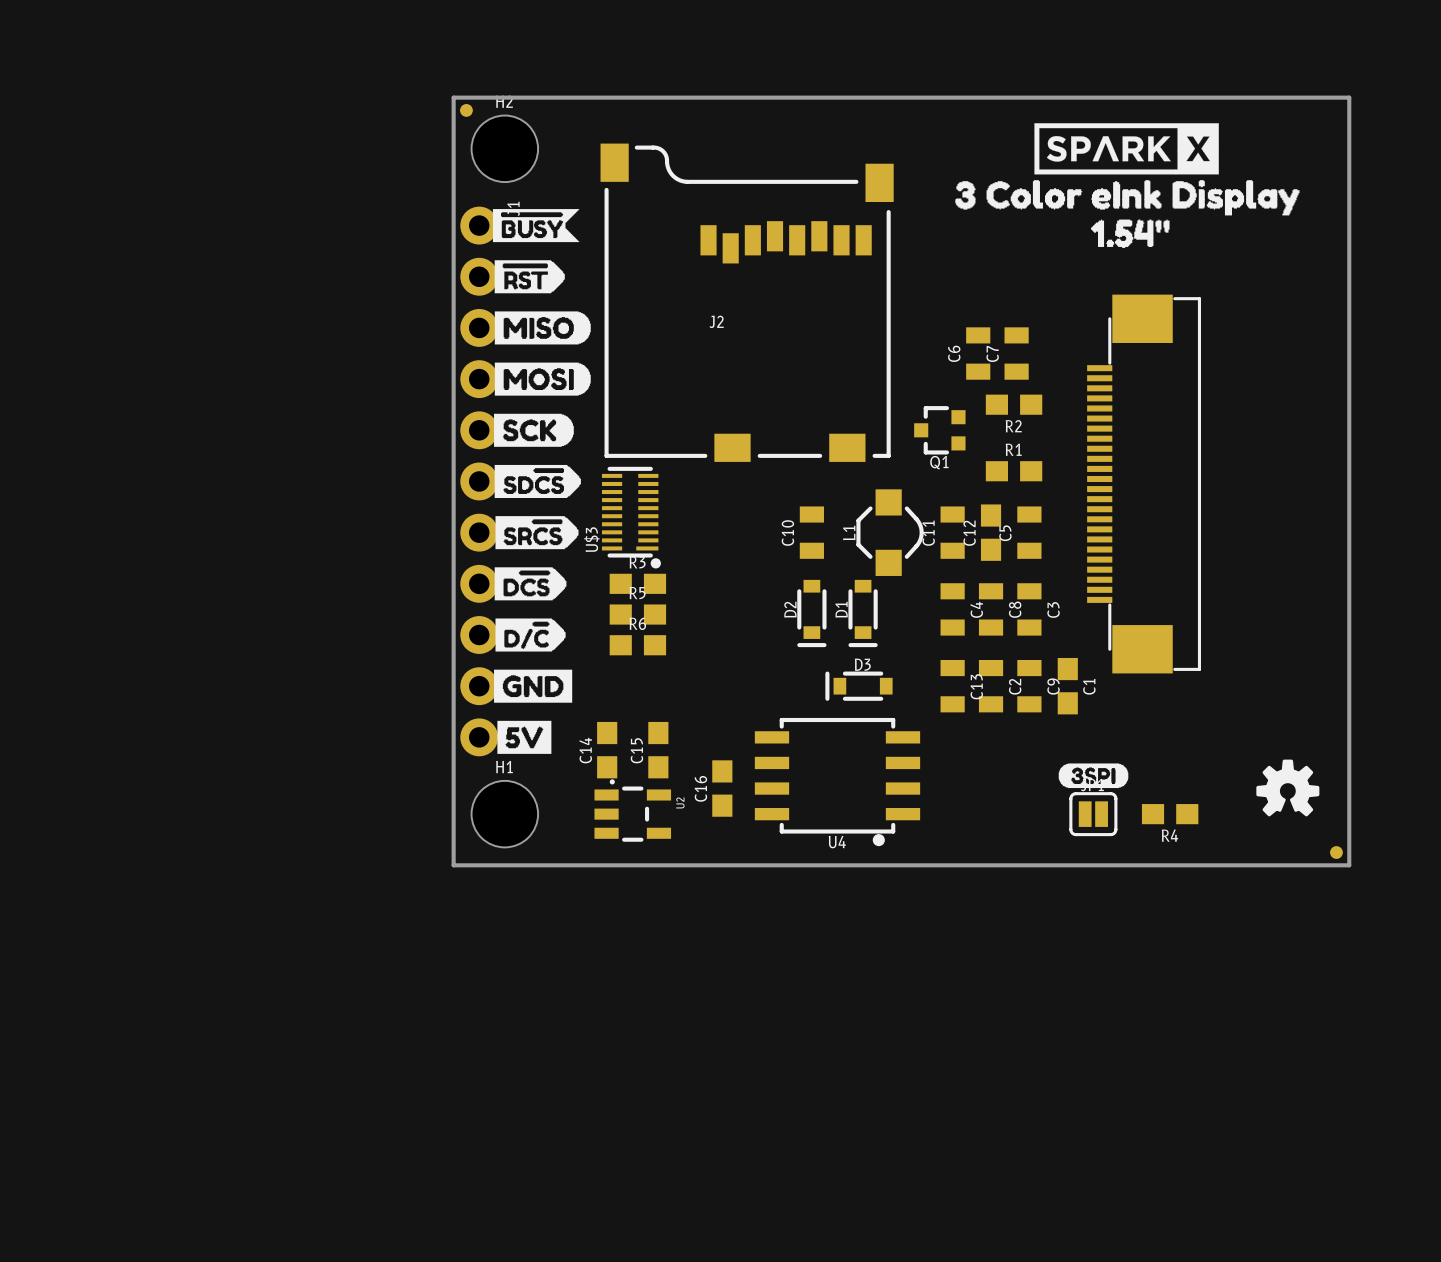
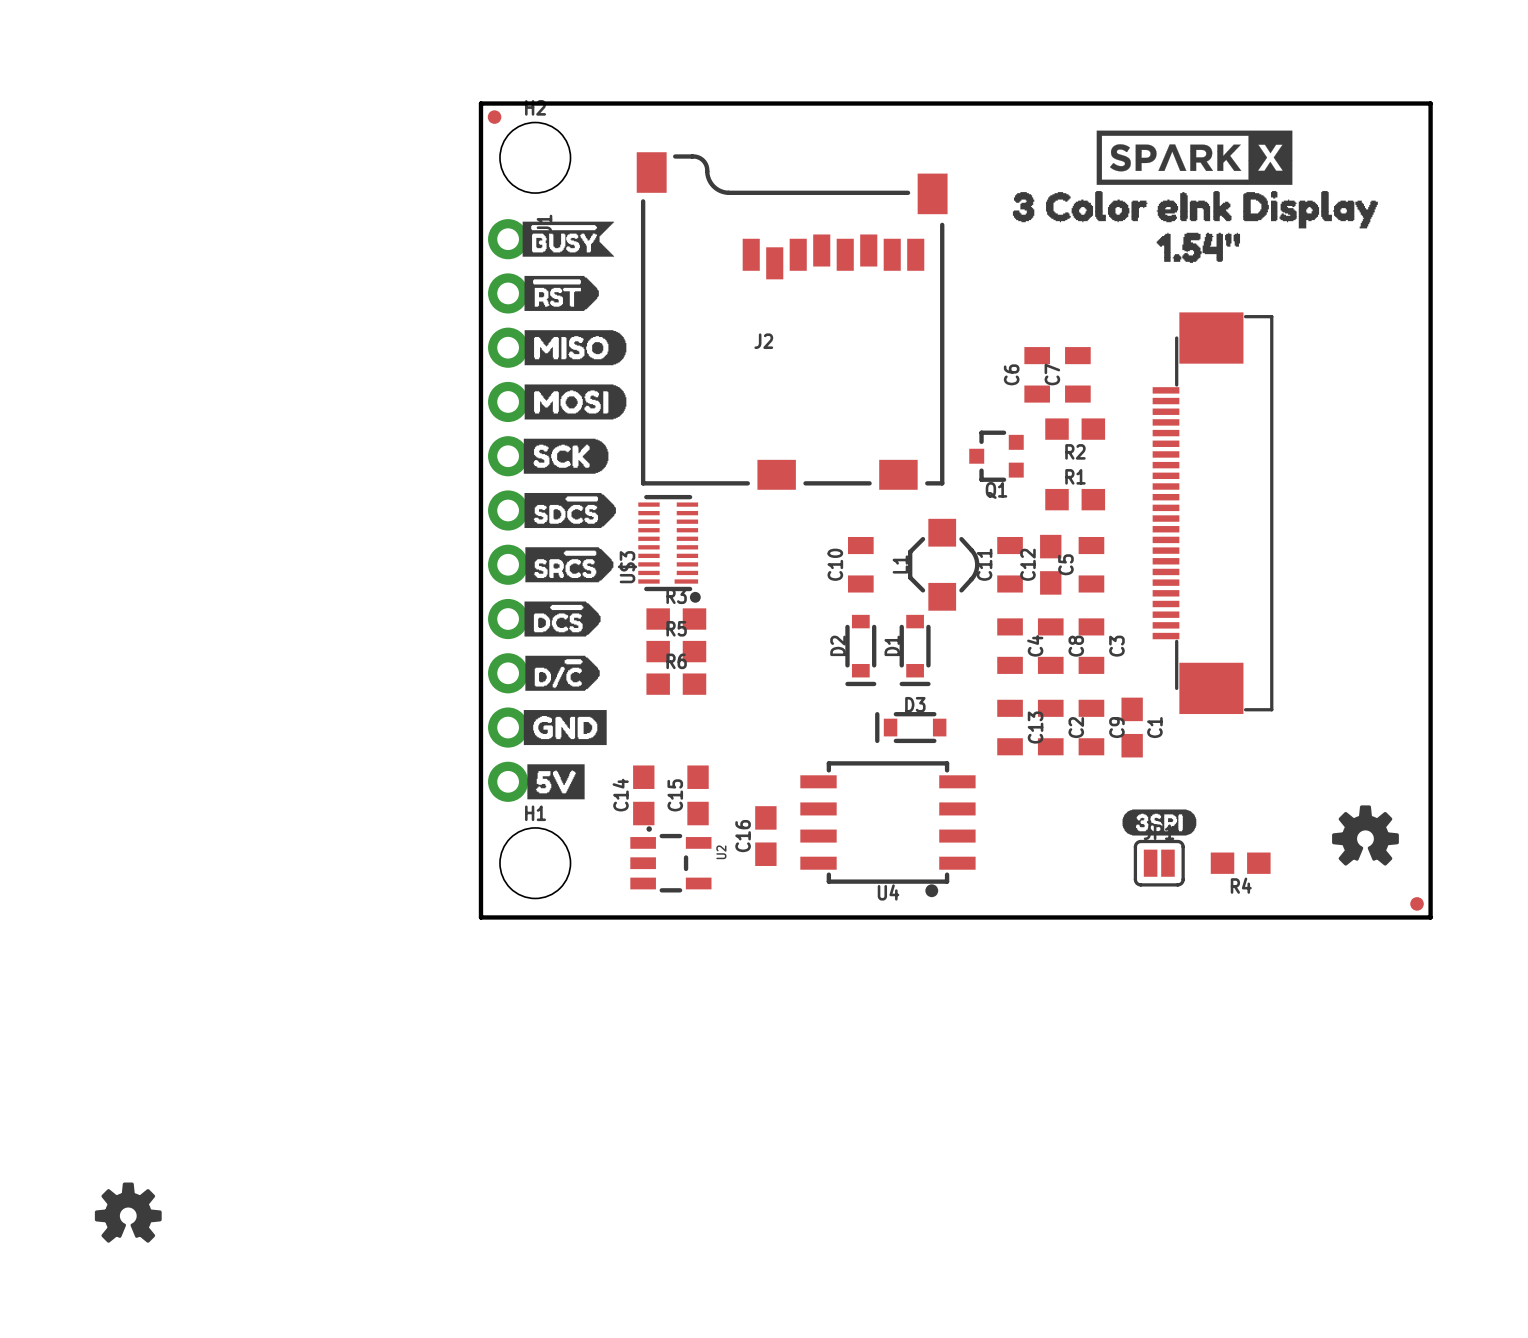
drawing: none -> [94, 1182, 162, 1243]

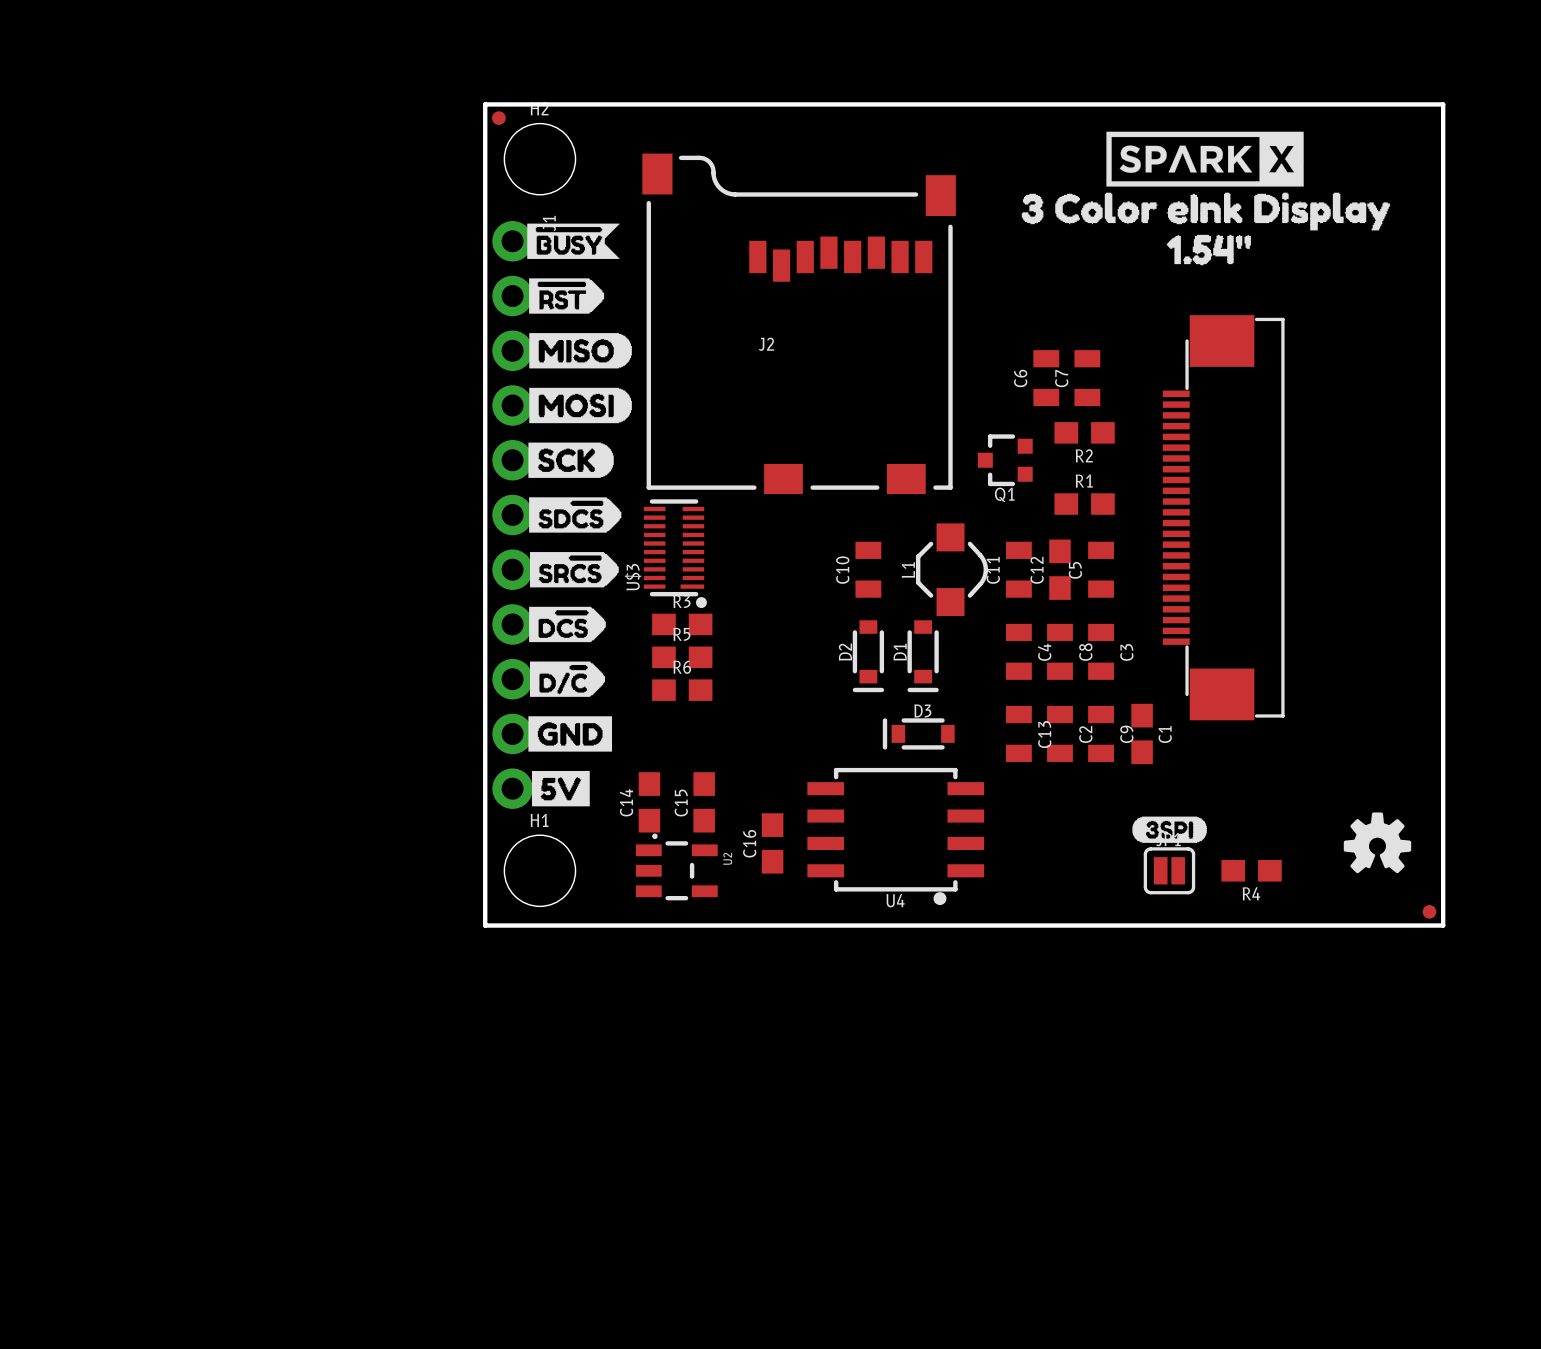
drawing: [94, 1182, 162, 1243] -> none

